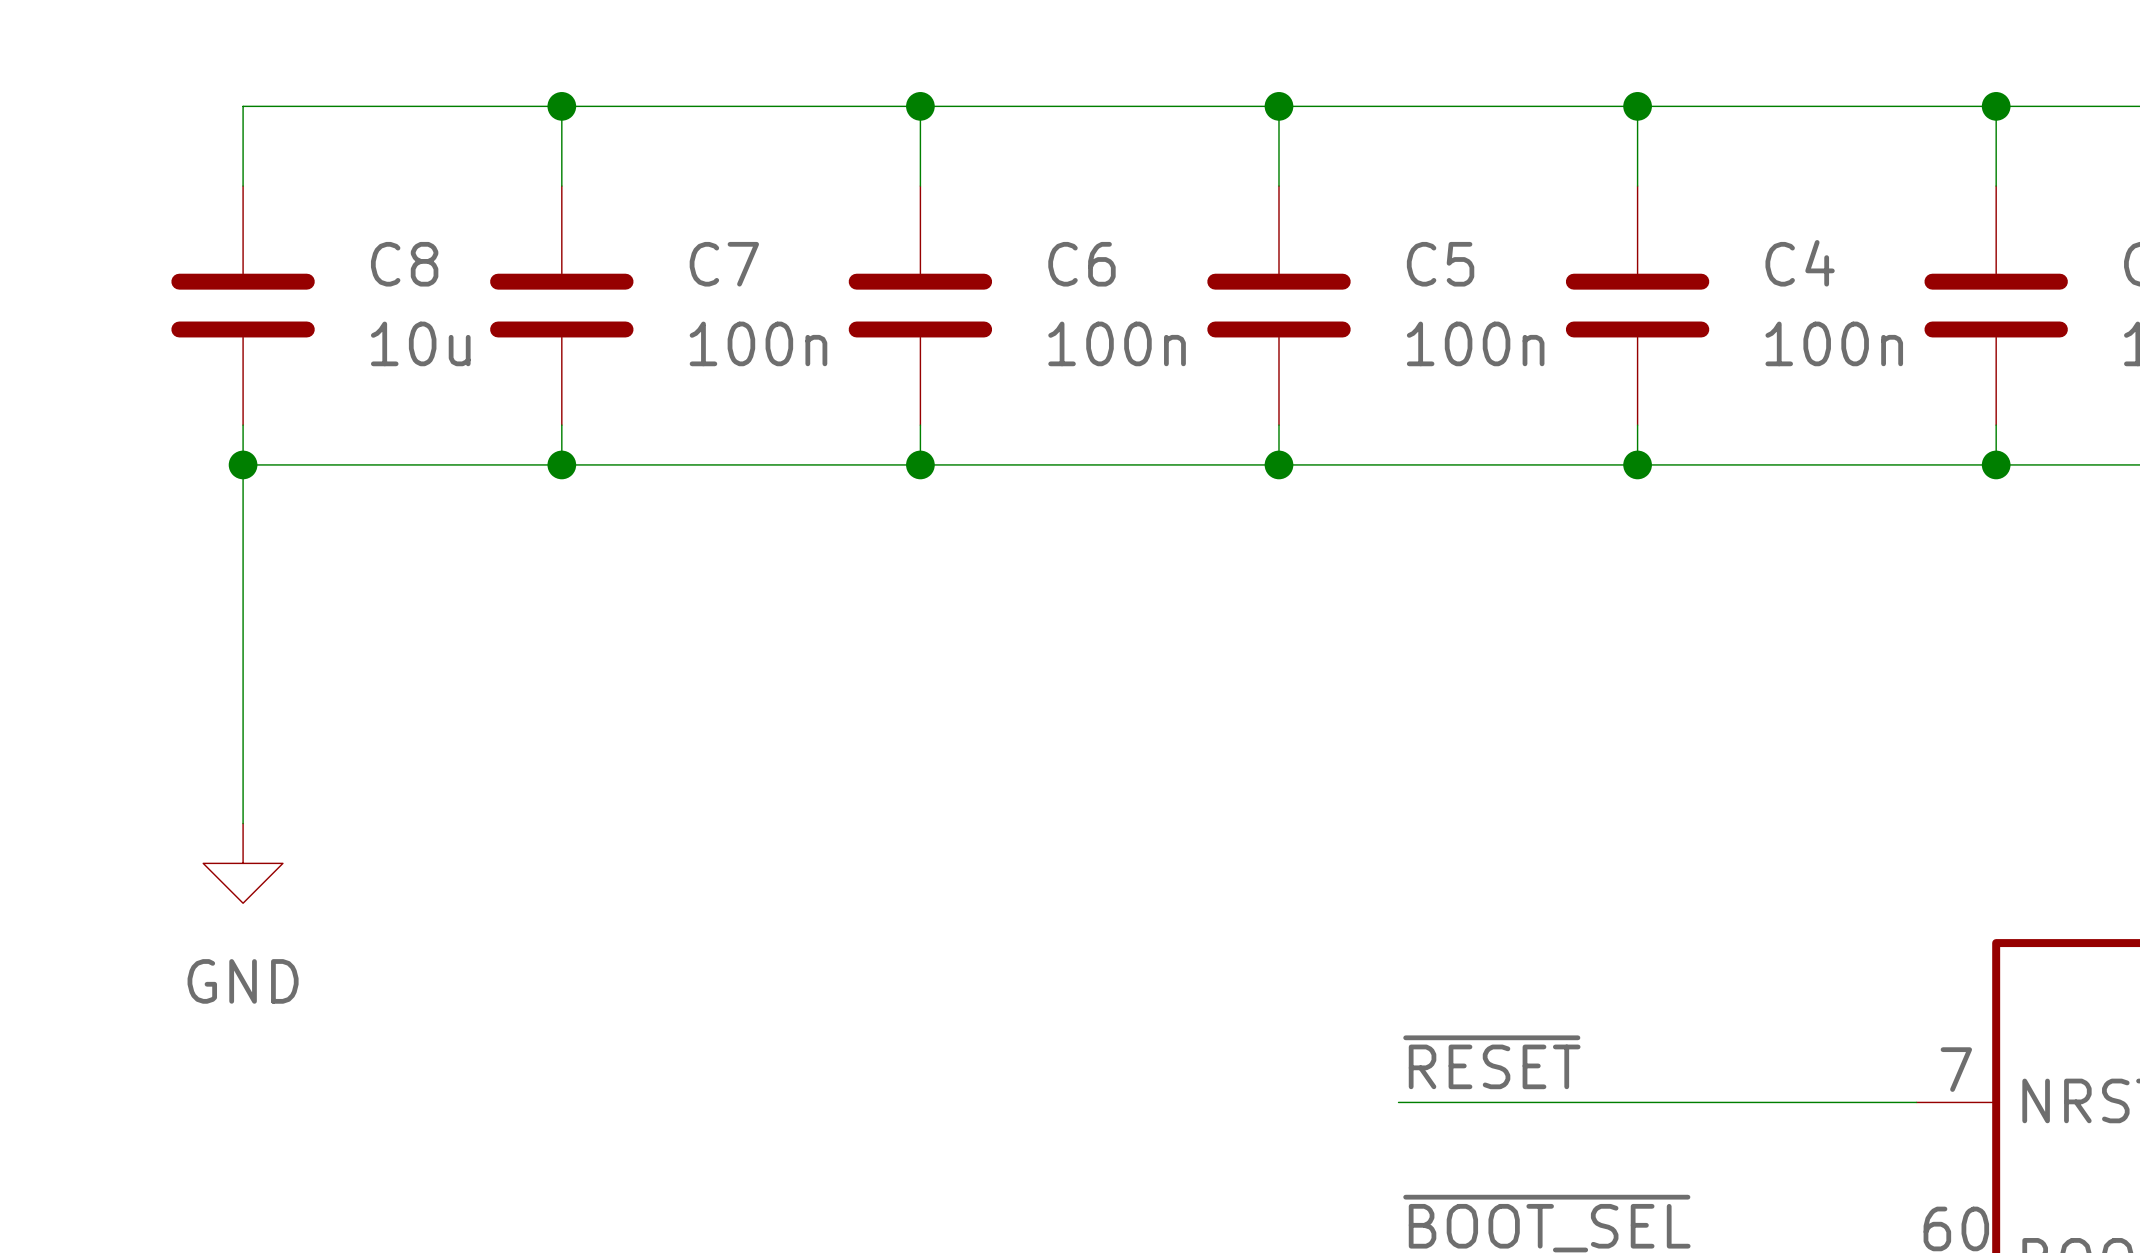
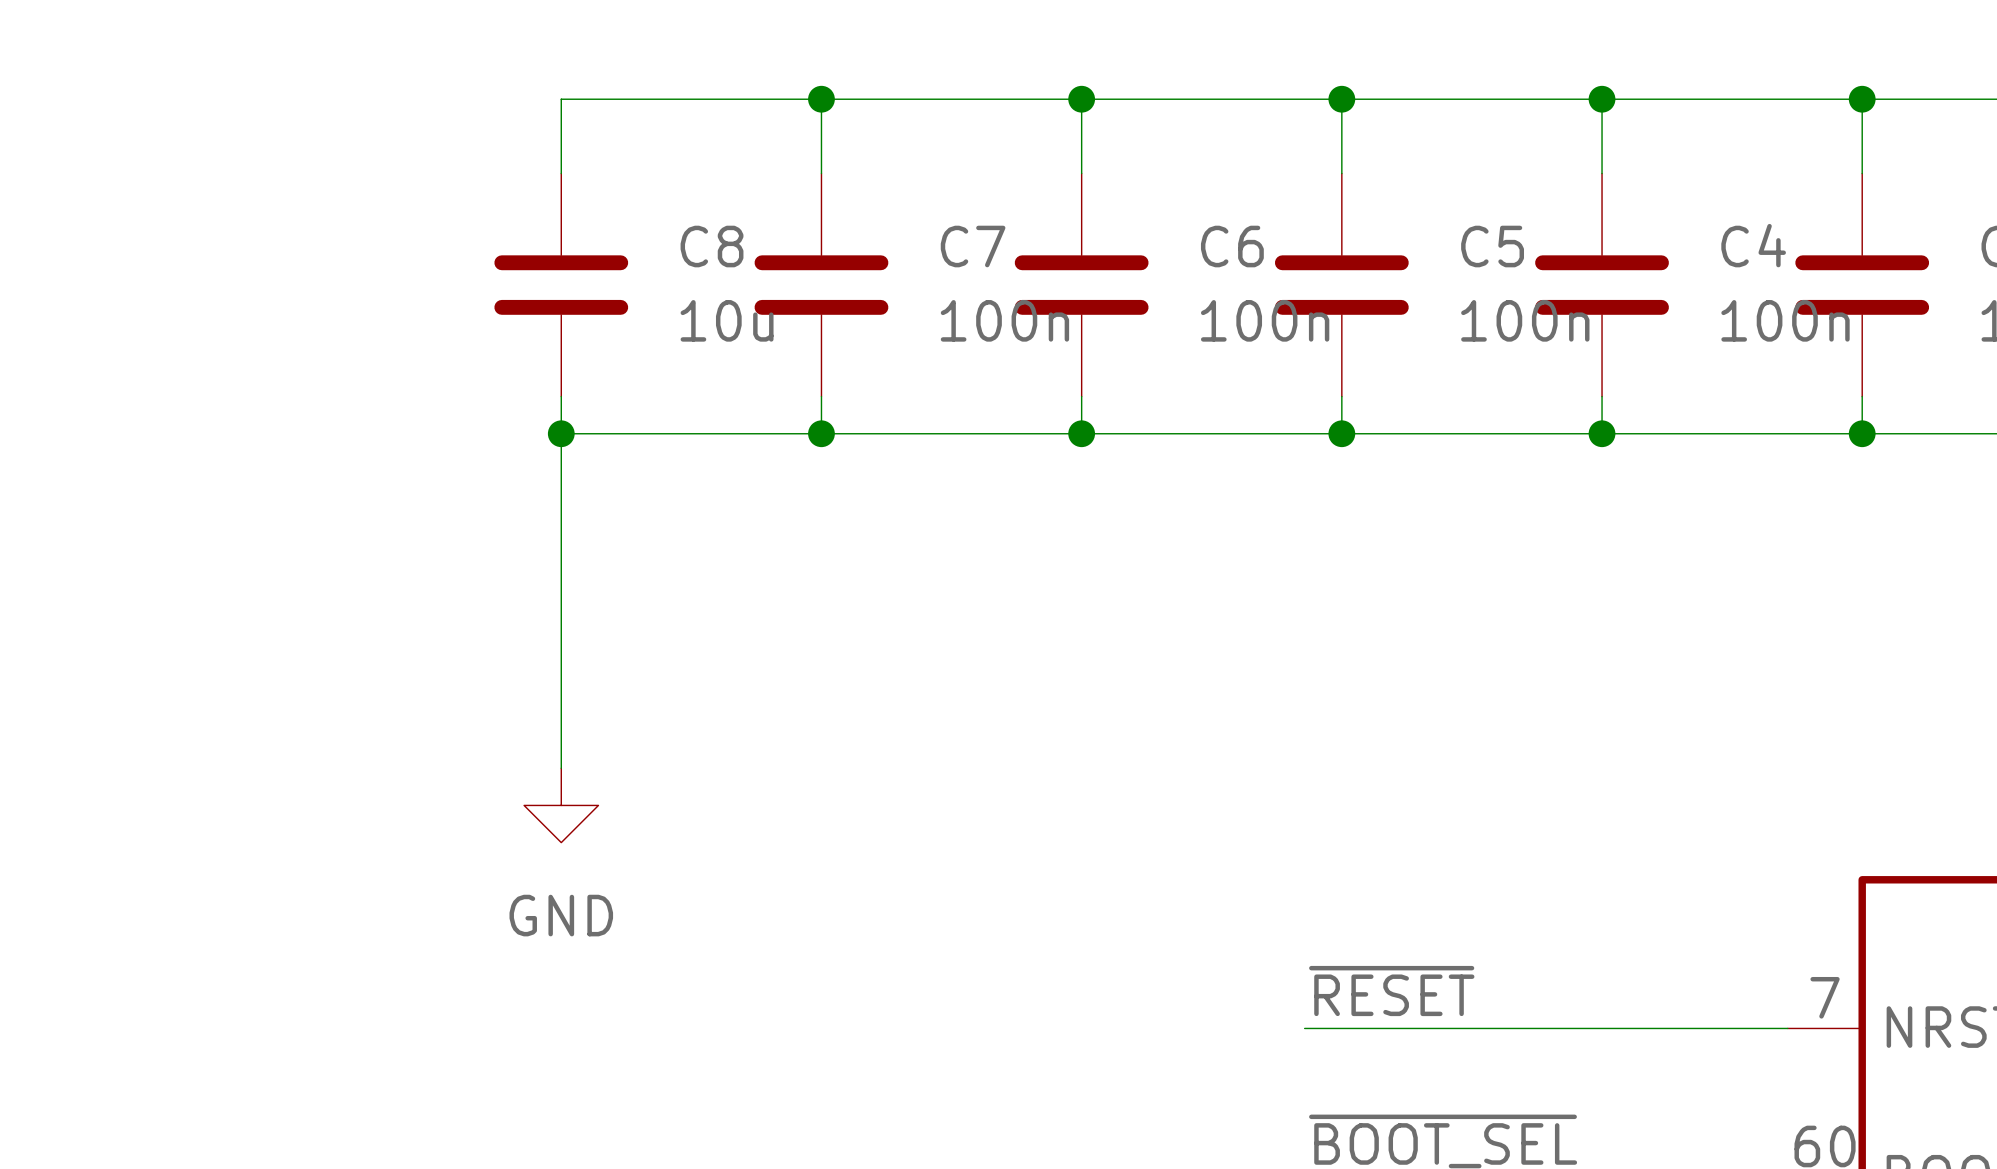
wire: (561, 106) (561, 186) -> none
junction: (561, 106) -> none
wire: (601, 106) (243, 106) (243, 186) -> (561, 99) (561, 173)
wire: (920, 106) (920, 186) -> (821, 99) (821, 173)
junction position: (920, 106) -> (821, 99)
junction: none -> (1081, 99)
wire: (1278, 106) (1278, 186) -> (1081, 99) (1081, 173)
junction: (1278, 106) -> none
wire: none -> (1341, 99) (1341, 173)
junction: none -> (1341, 99)
wire: (1637, 106) (1637, 186) -> (1602, 99) (1602, 173)
junction position: (1637, 106) -> (1602, 99)
C8 position: (243, 305) -> (561, 285)
C7 position: (561, 305) -> (821, 285)
C6 position: (920, 305) -> (1081, 285)
C5 position: (1278, 305) -> (1341, 285)
C4 position: (1637, 305) -> (1602, 285)
wire: (243, 425) (243, 823) -> (561, 396) (561, 768)
wire: (561, 425) (561, 464) -> none
wire: (920, 425) (920, 464) -> (821, 396) (821, 433)
wire: (1278, 425) (1278, 464) -> (1081, 396) (1081, 433)
wire: none -> (1341, 396) (1341, 433)
wire: (1637, 425) (1637, 464) -> (1602, 396) (1602, 433)
wire: (243, 464) (601, 464) -> none
junction: (243, 464) -> none
junction position: (561, 464) -> (561, 433)
junction position: (920, 464) -> (821, 433)
junction: none -> (1081, 433)
junction: (1278, 464) -> none
junction: none -> (1341, 433)
junction position: (1637, 464) -> (1602, 433)
power symbol position: GND (243, 863) -> GND (561, 805)

